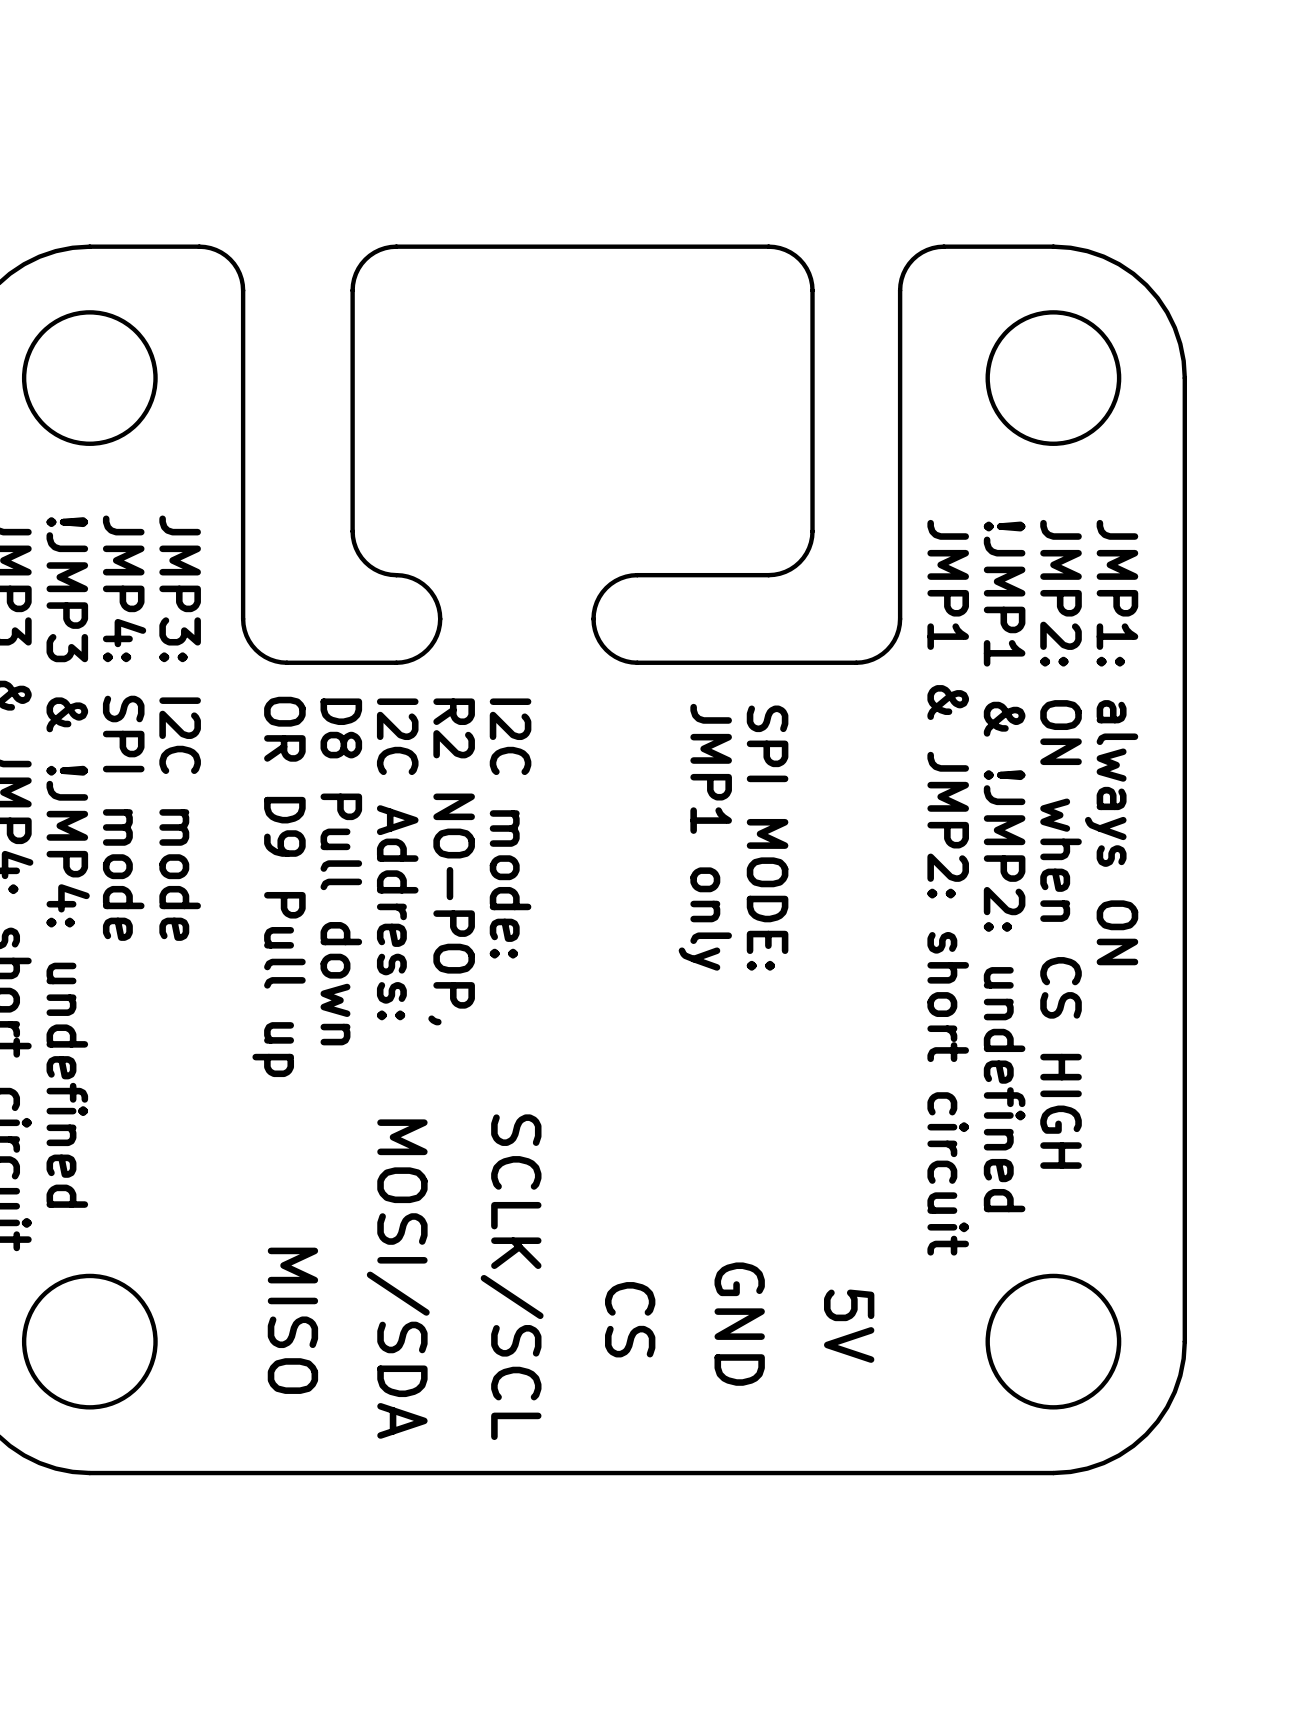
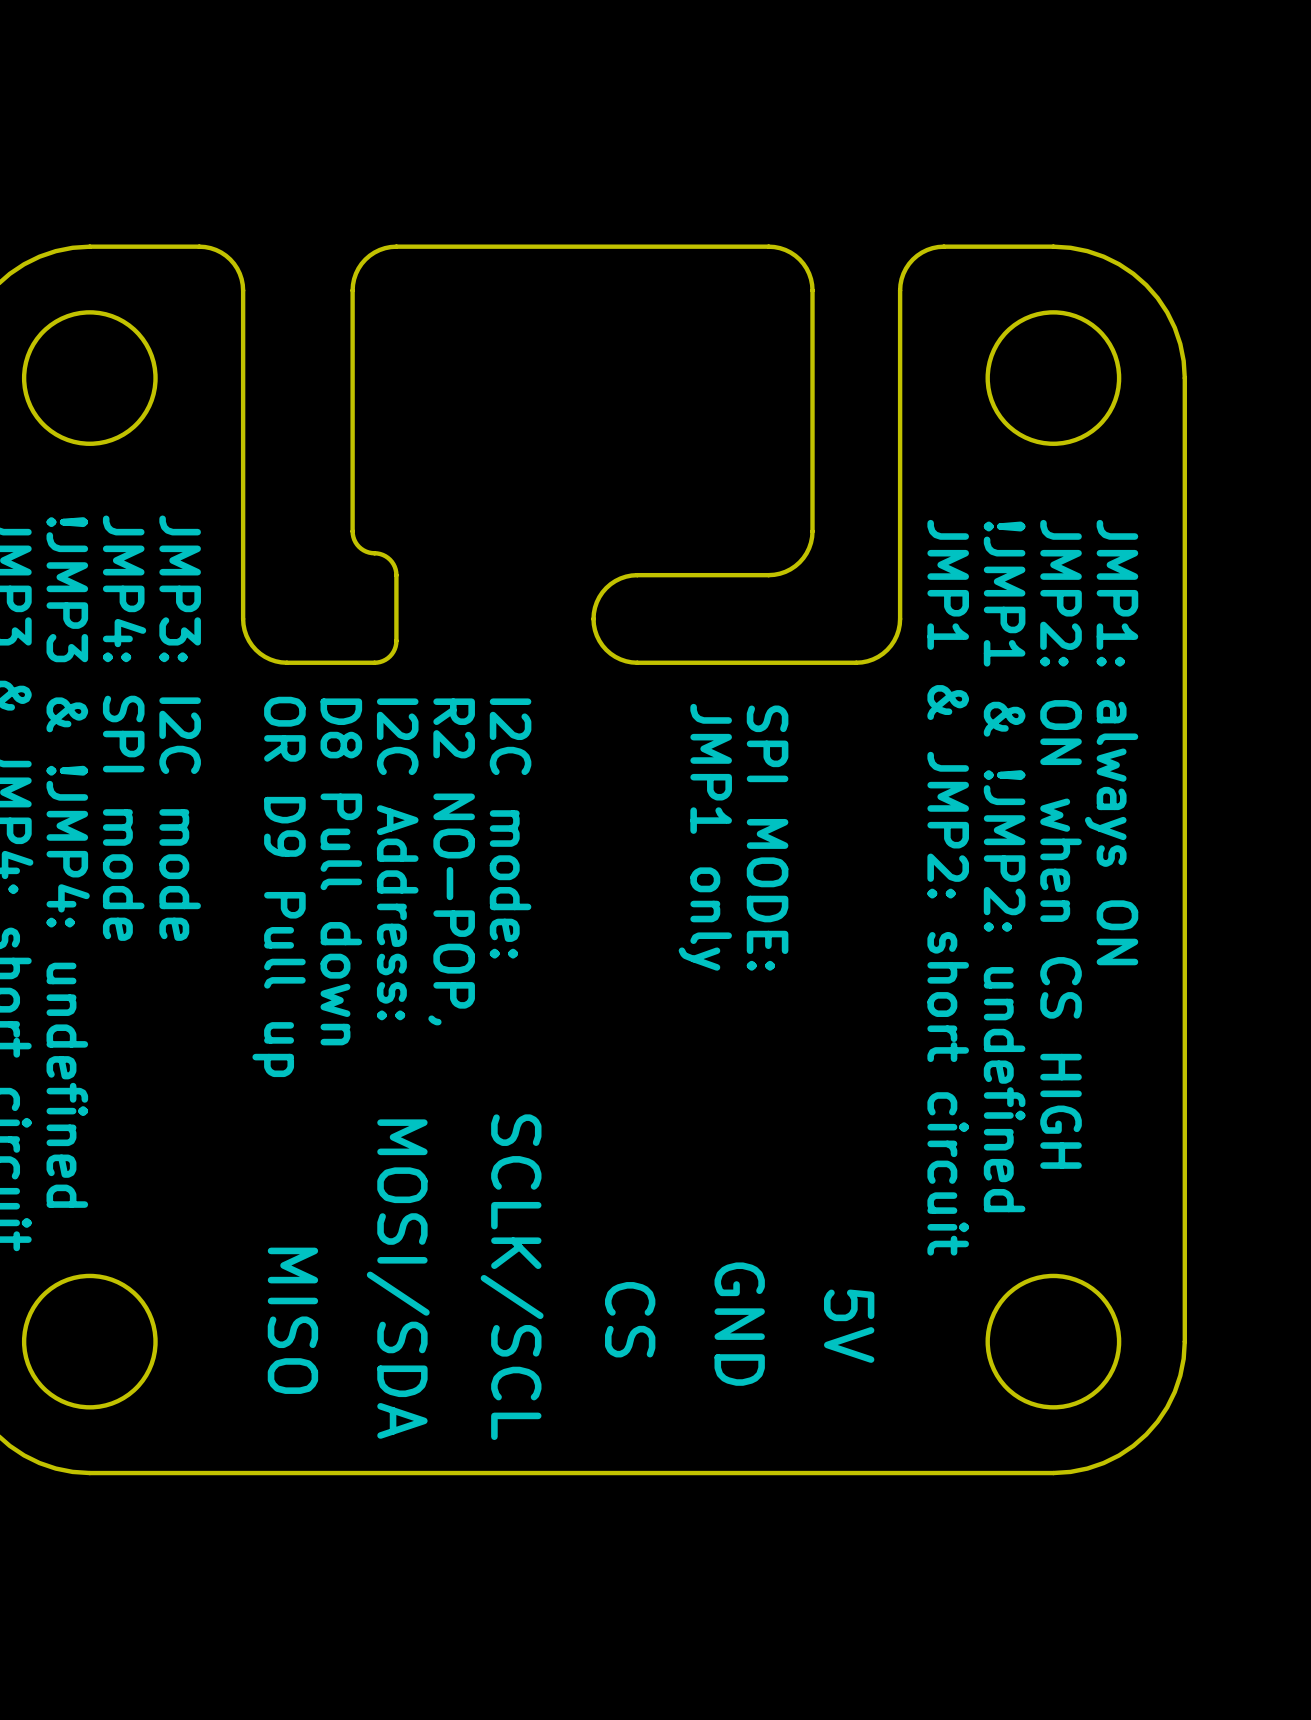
board edge: (352, 531) (355, 548) (365, 562) (379, 571) (407, 576) (423, 584) (434, 597) (439, 613) (436, 635) (423, 653) (402, 662) (374, 662) -> (352, 531) (354, 539) (359, 546) (366, 551) (380, 554) (387, 557) (393, 564) (396, 572) (395, 646) (387, 658) (374, 662)

